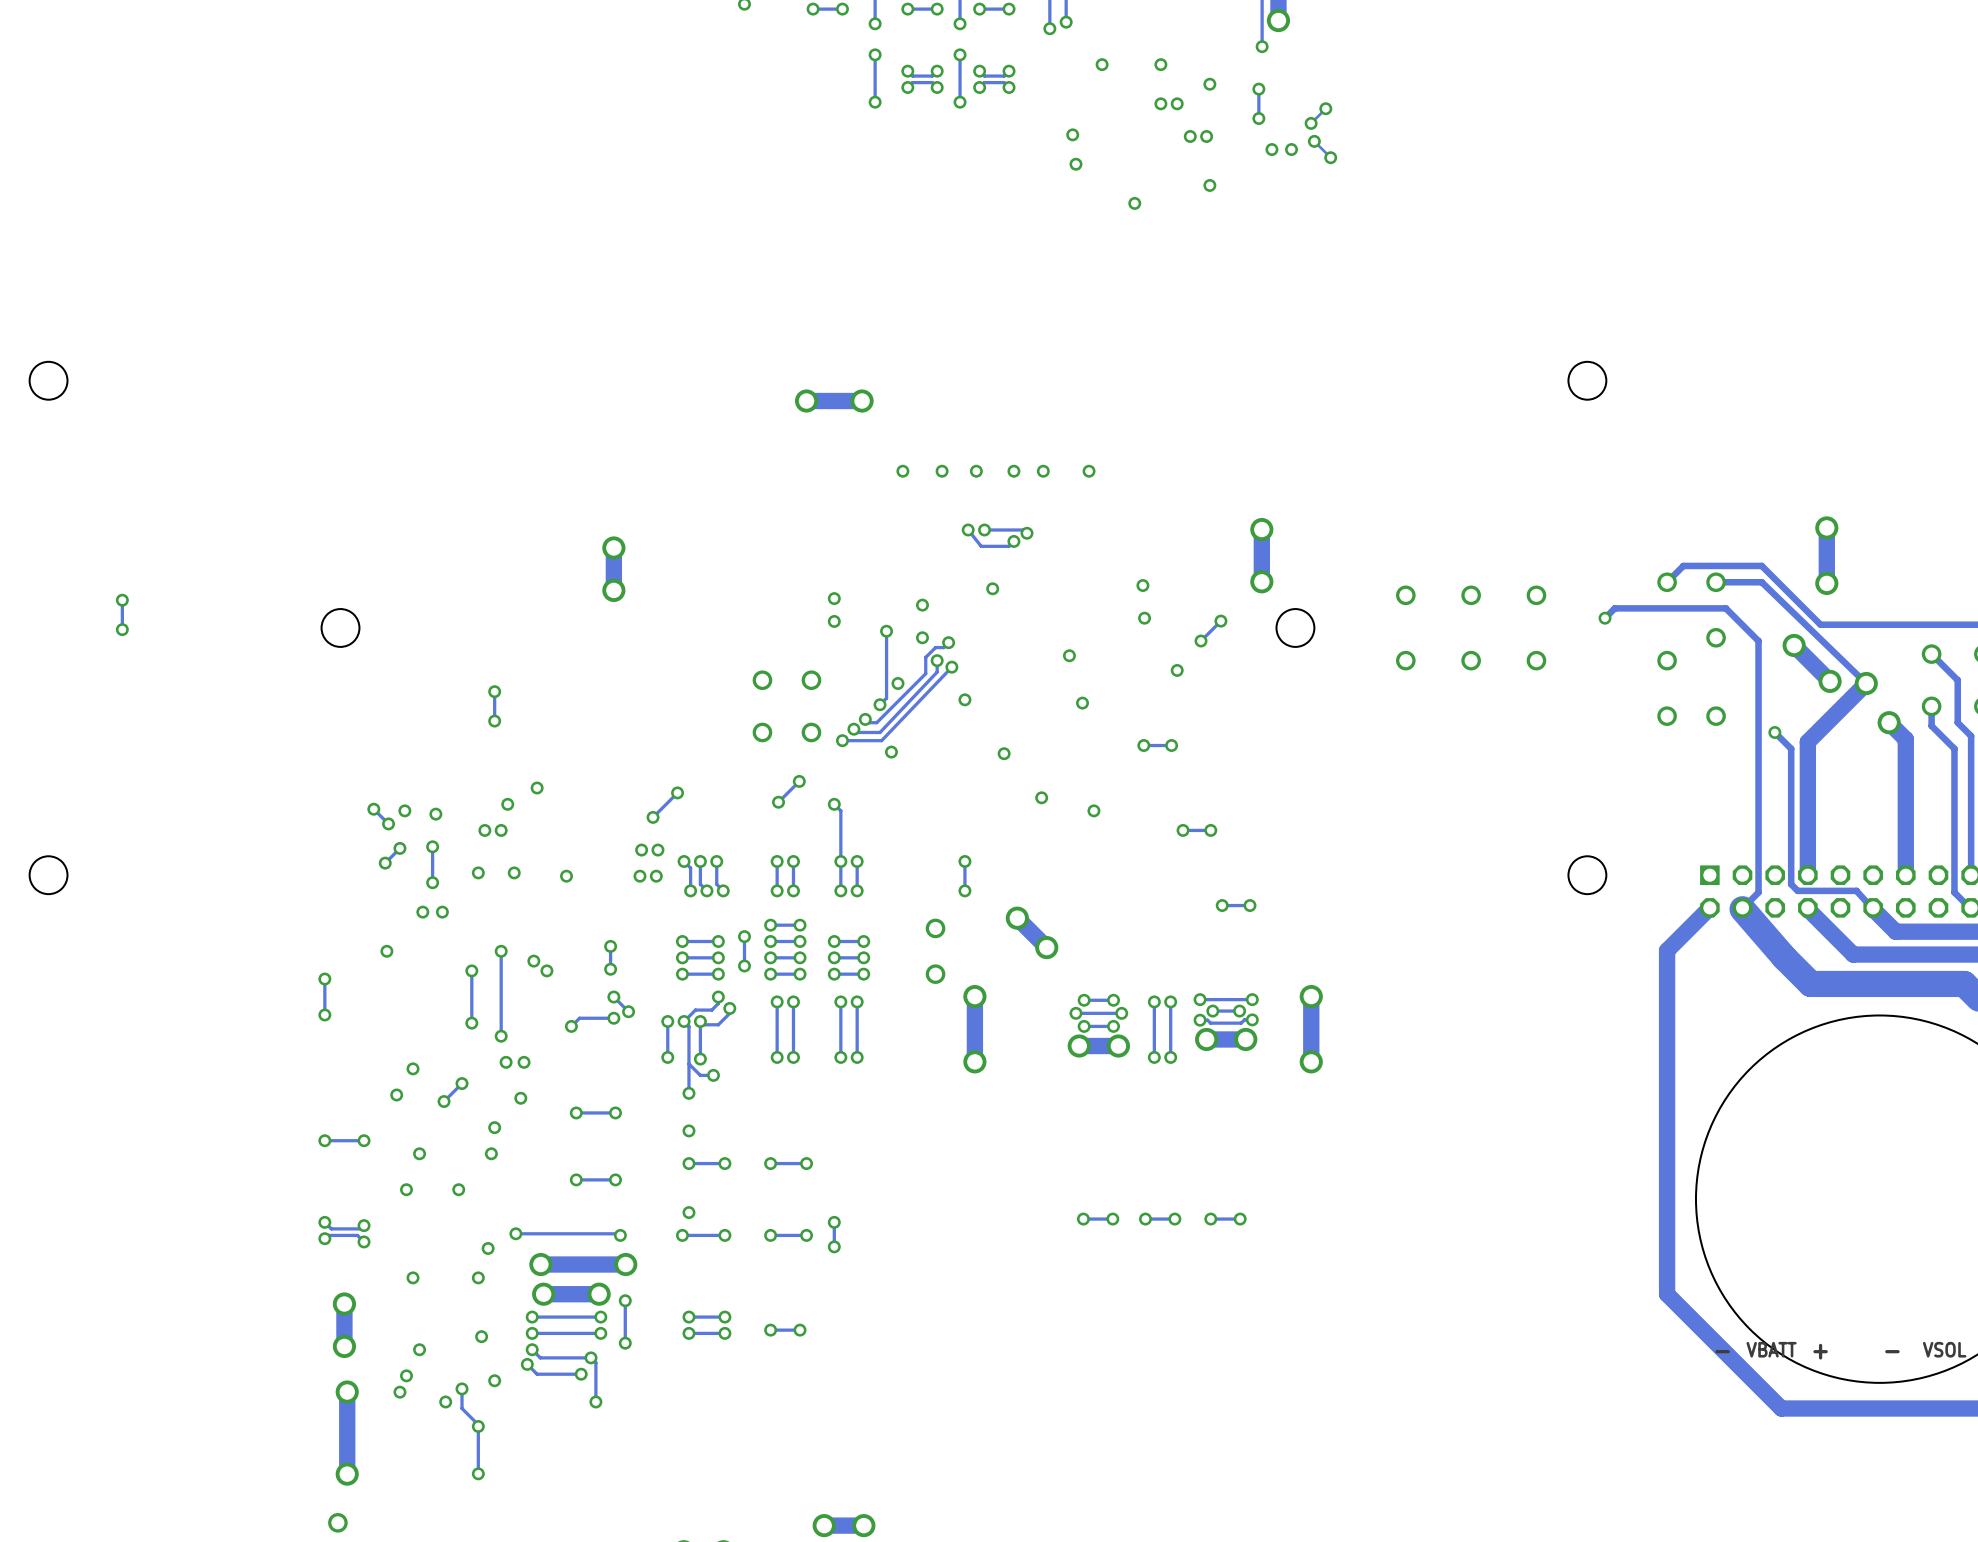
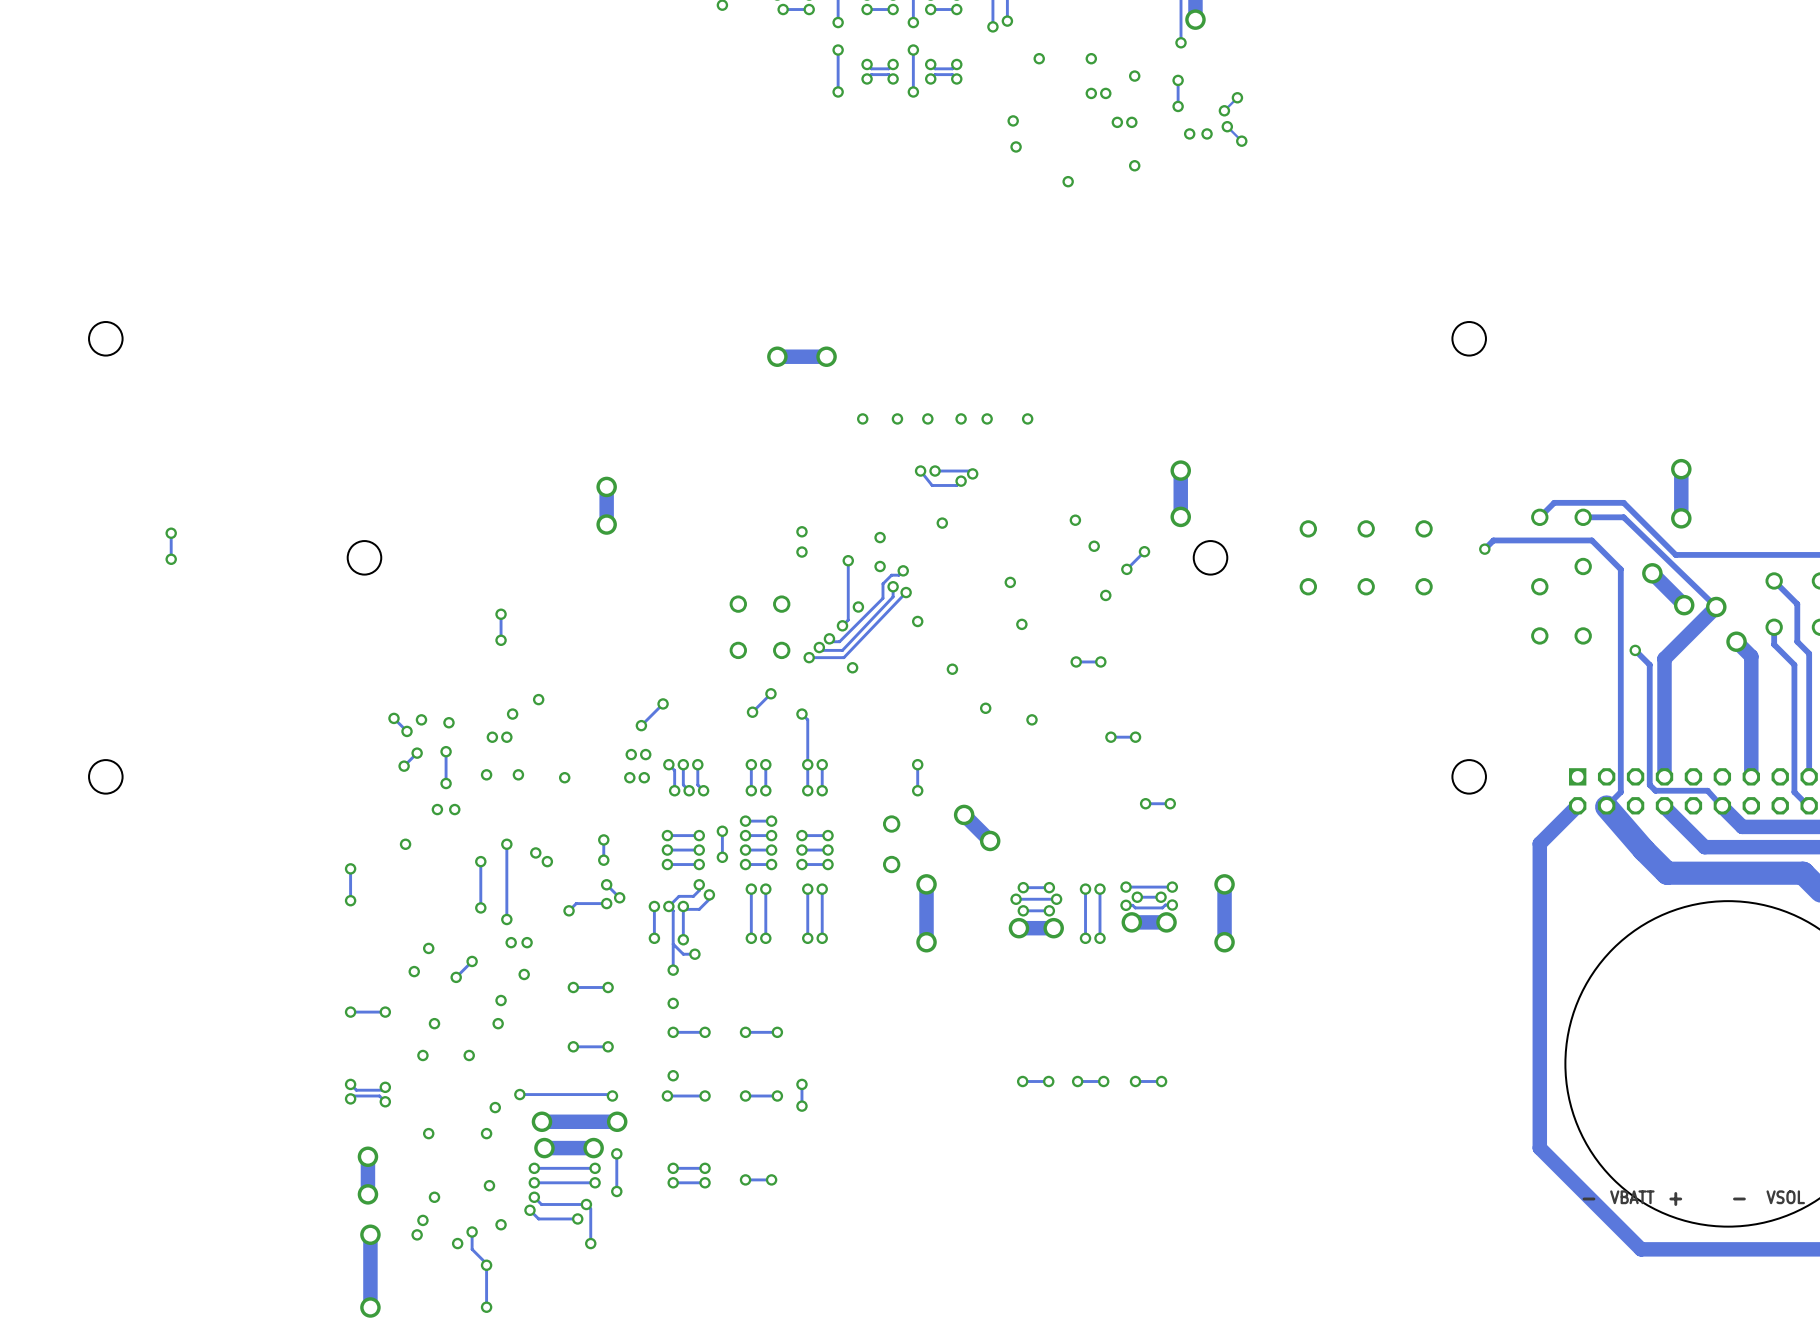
via position: (1144, 618) -> (1094, 546)

